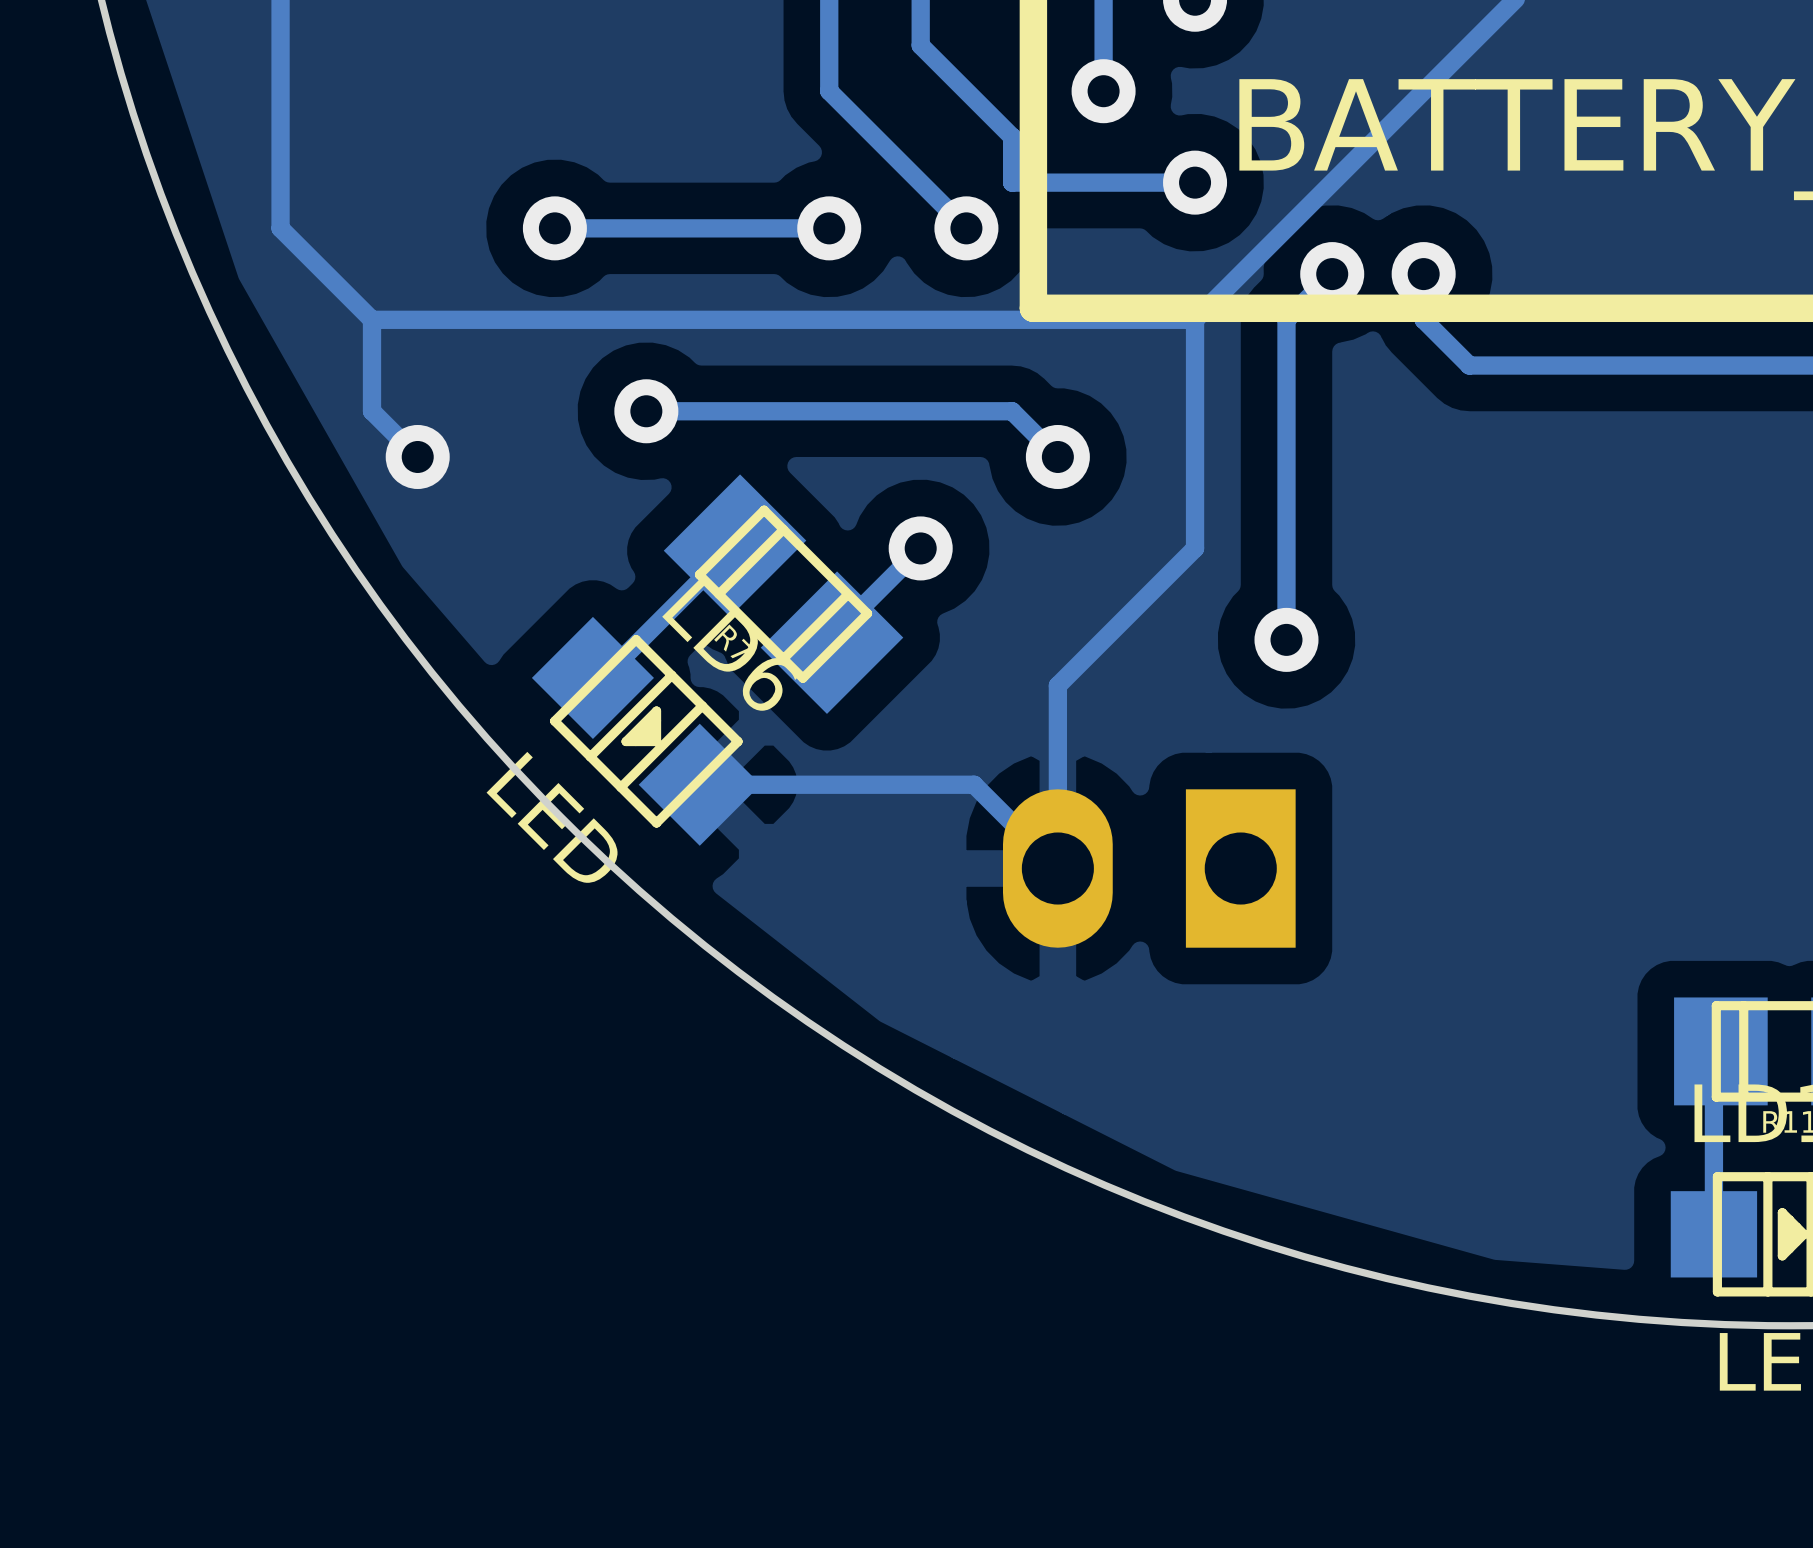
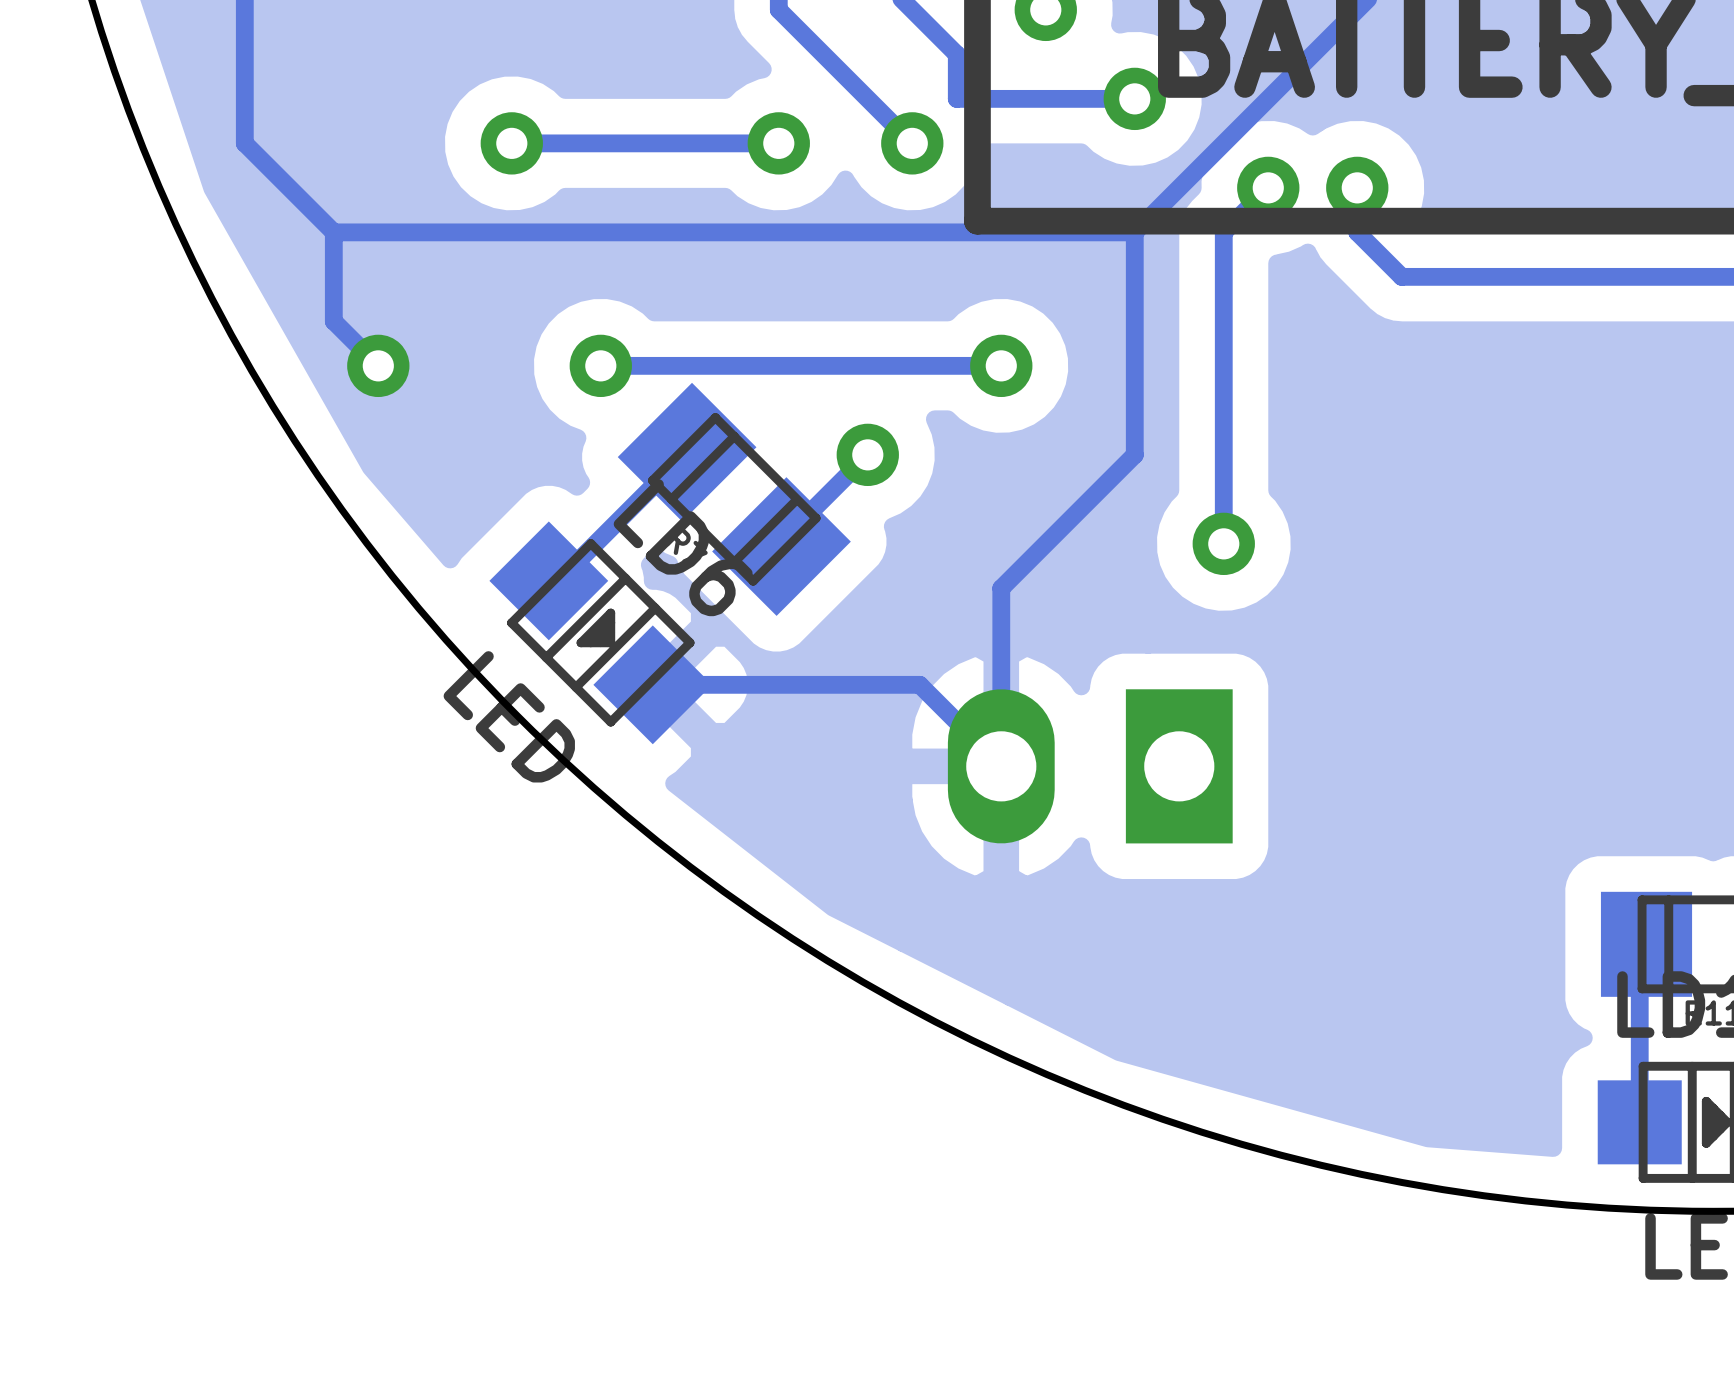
track: (646, 411) (1012, 411) (1057, 456) -> (600, 365) (1001, 365)
via position: (646, 411) -> (600, 365)

